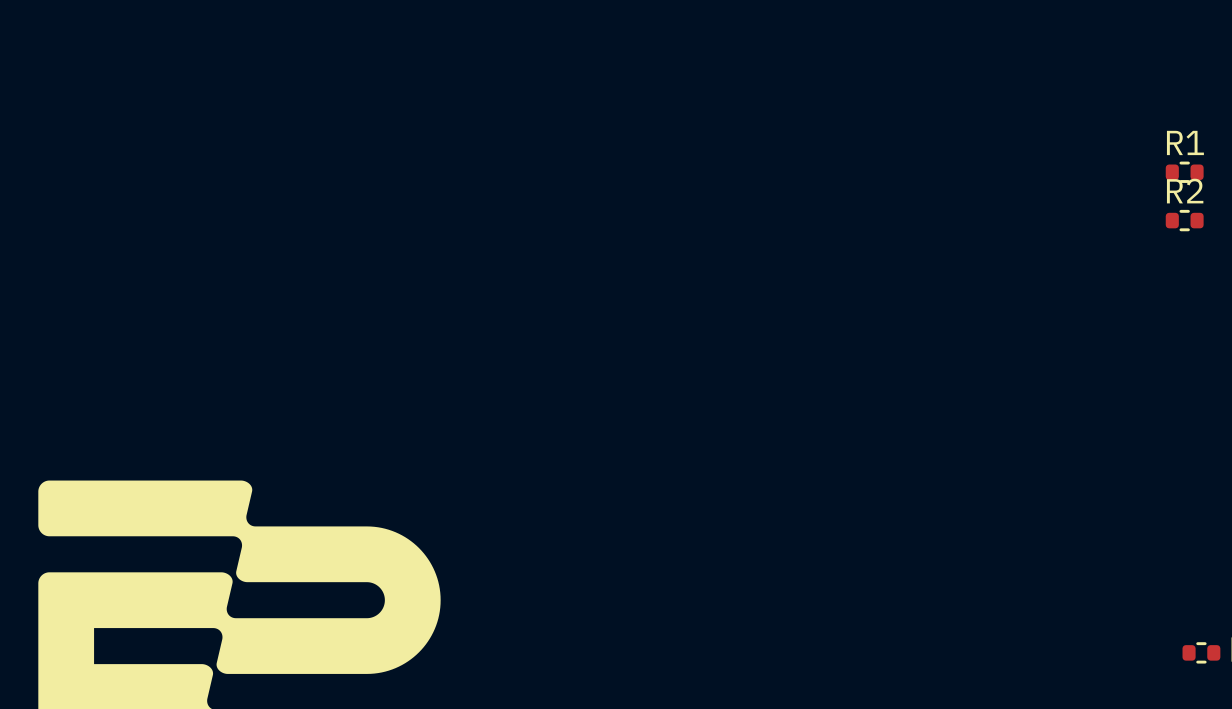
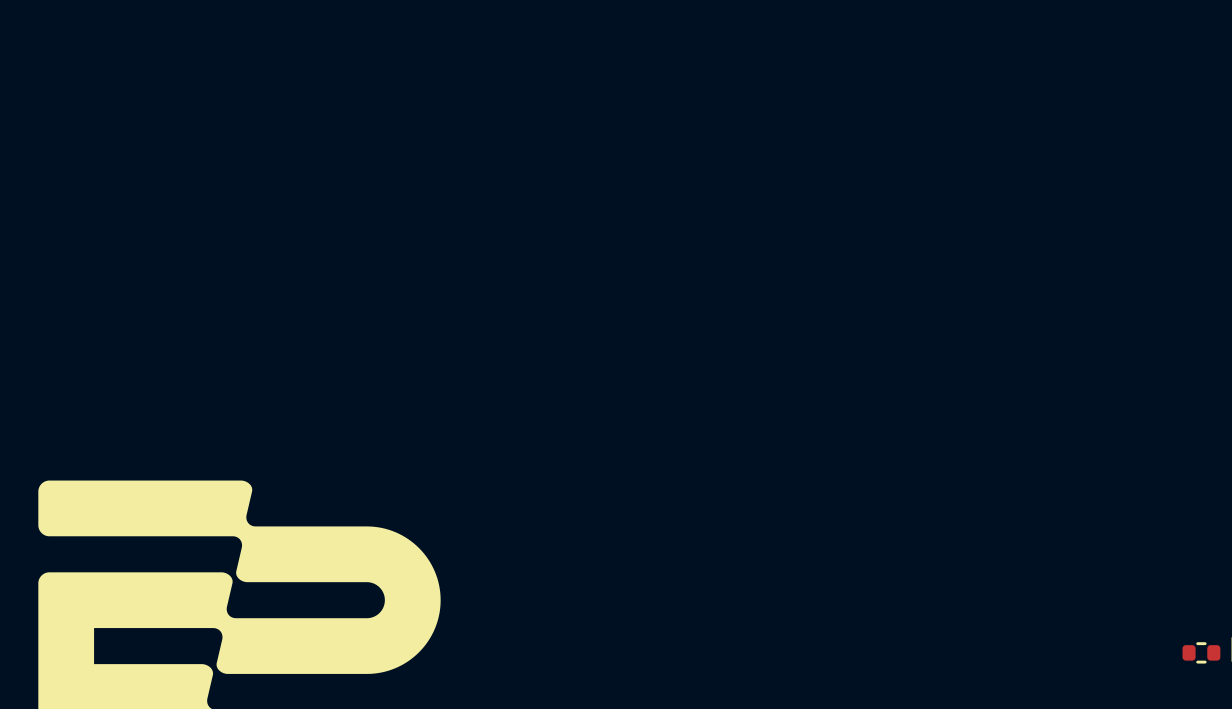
R1: (1184, 172) -> none
R2: (1184, 220) -> none

